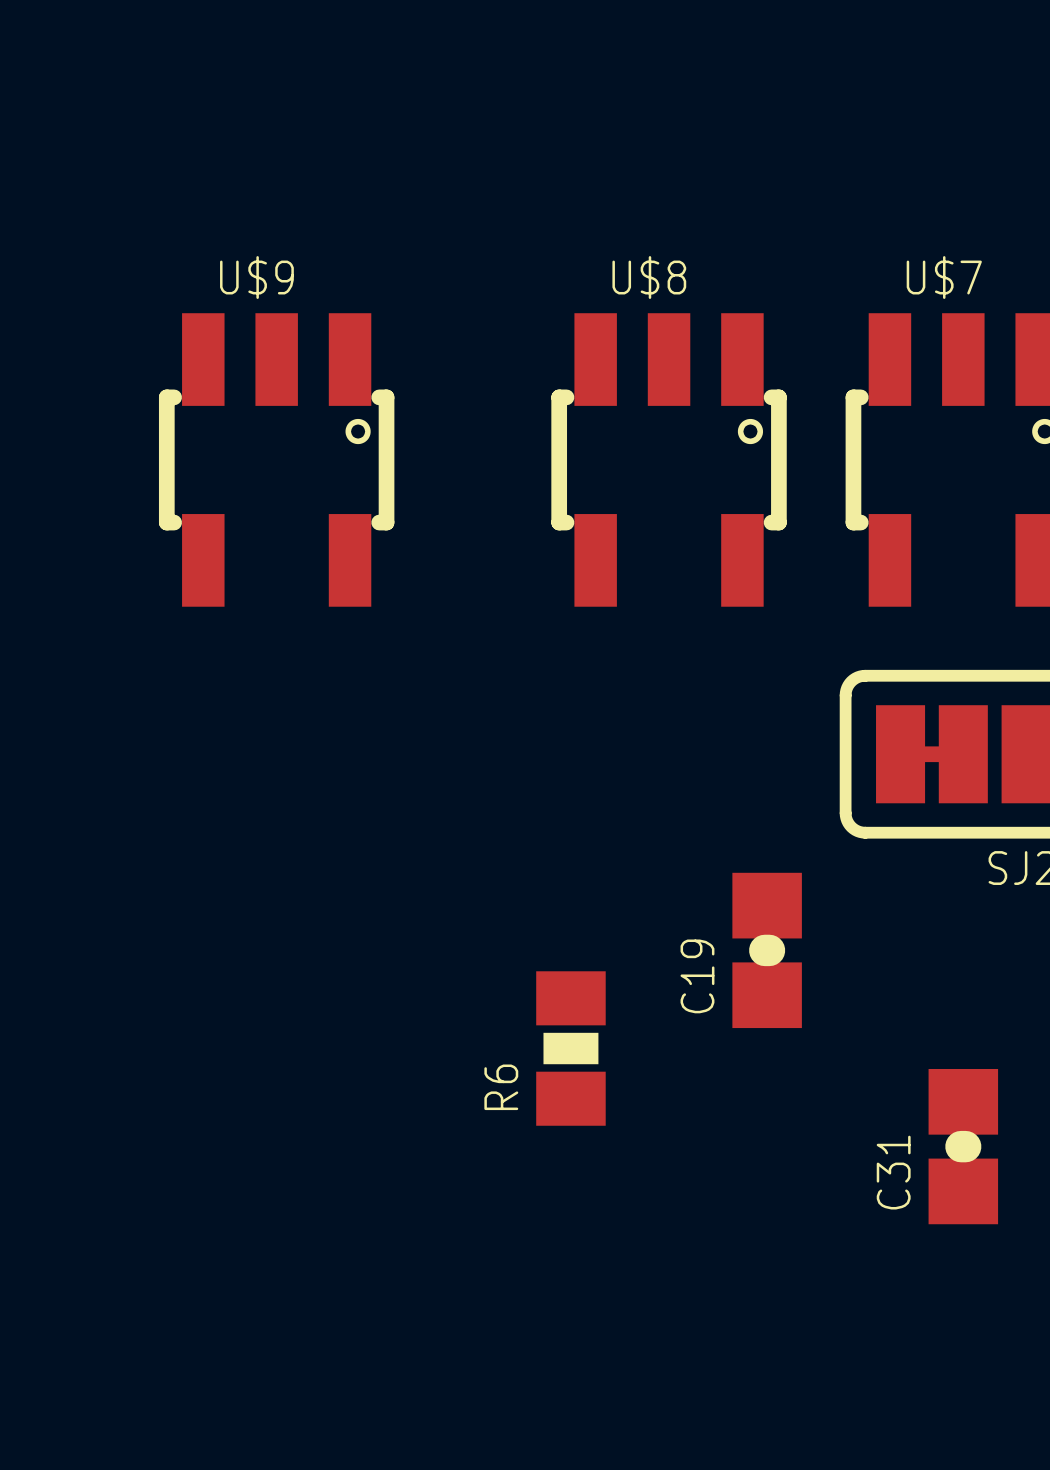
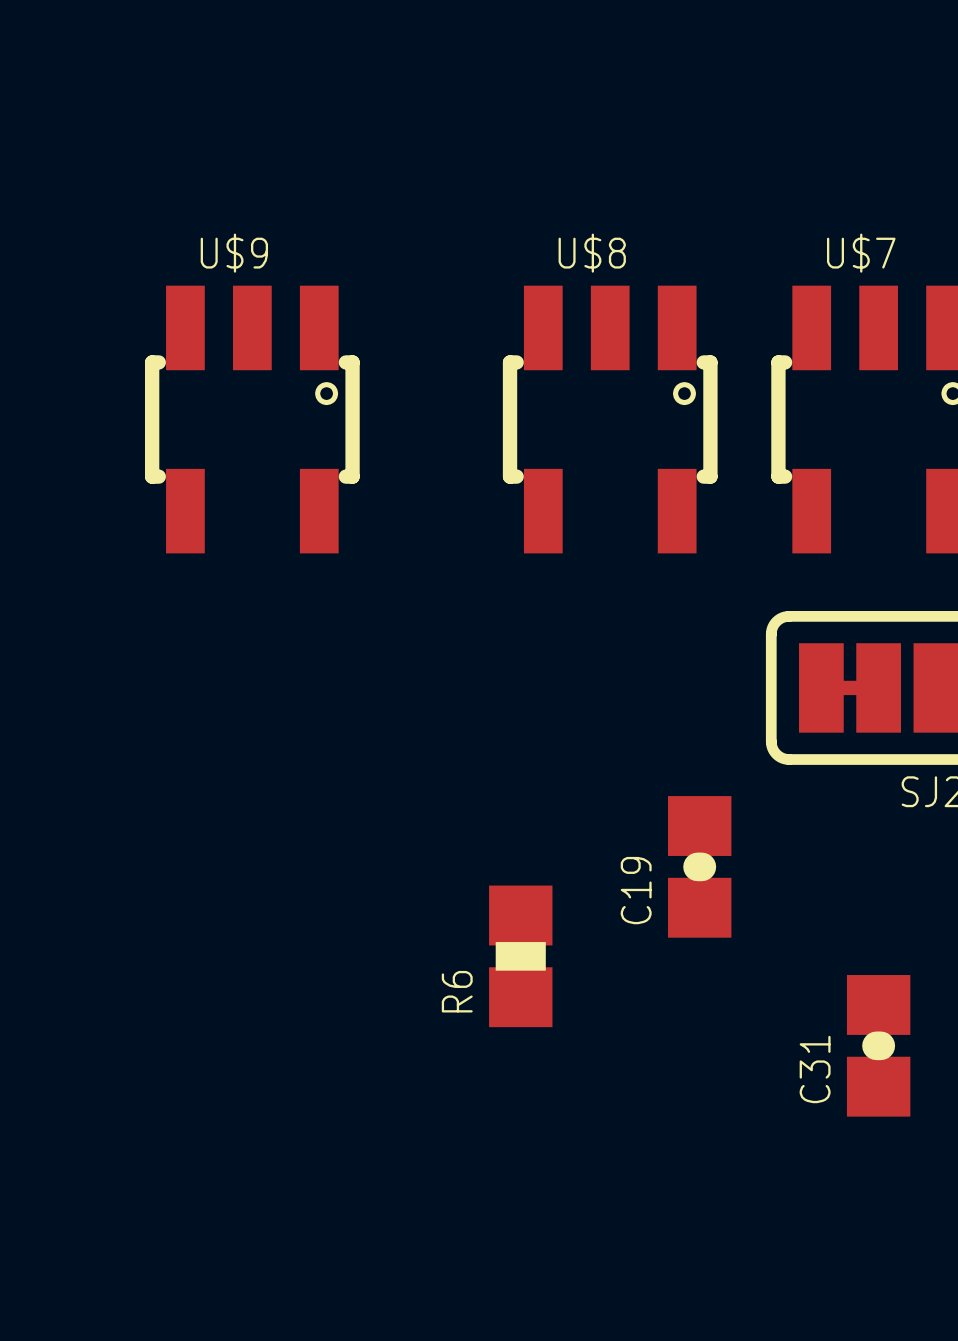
R6 footprint: [536, 971, 606, 1126] -> [489, 885, 553, 1028]

